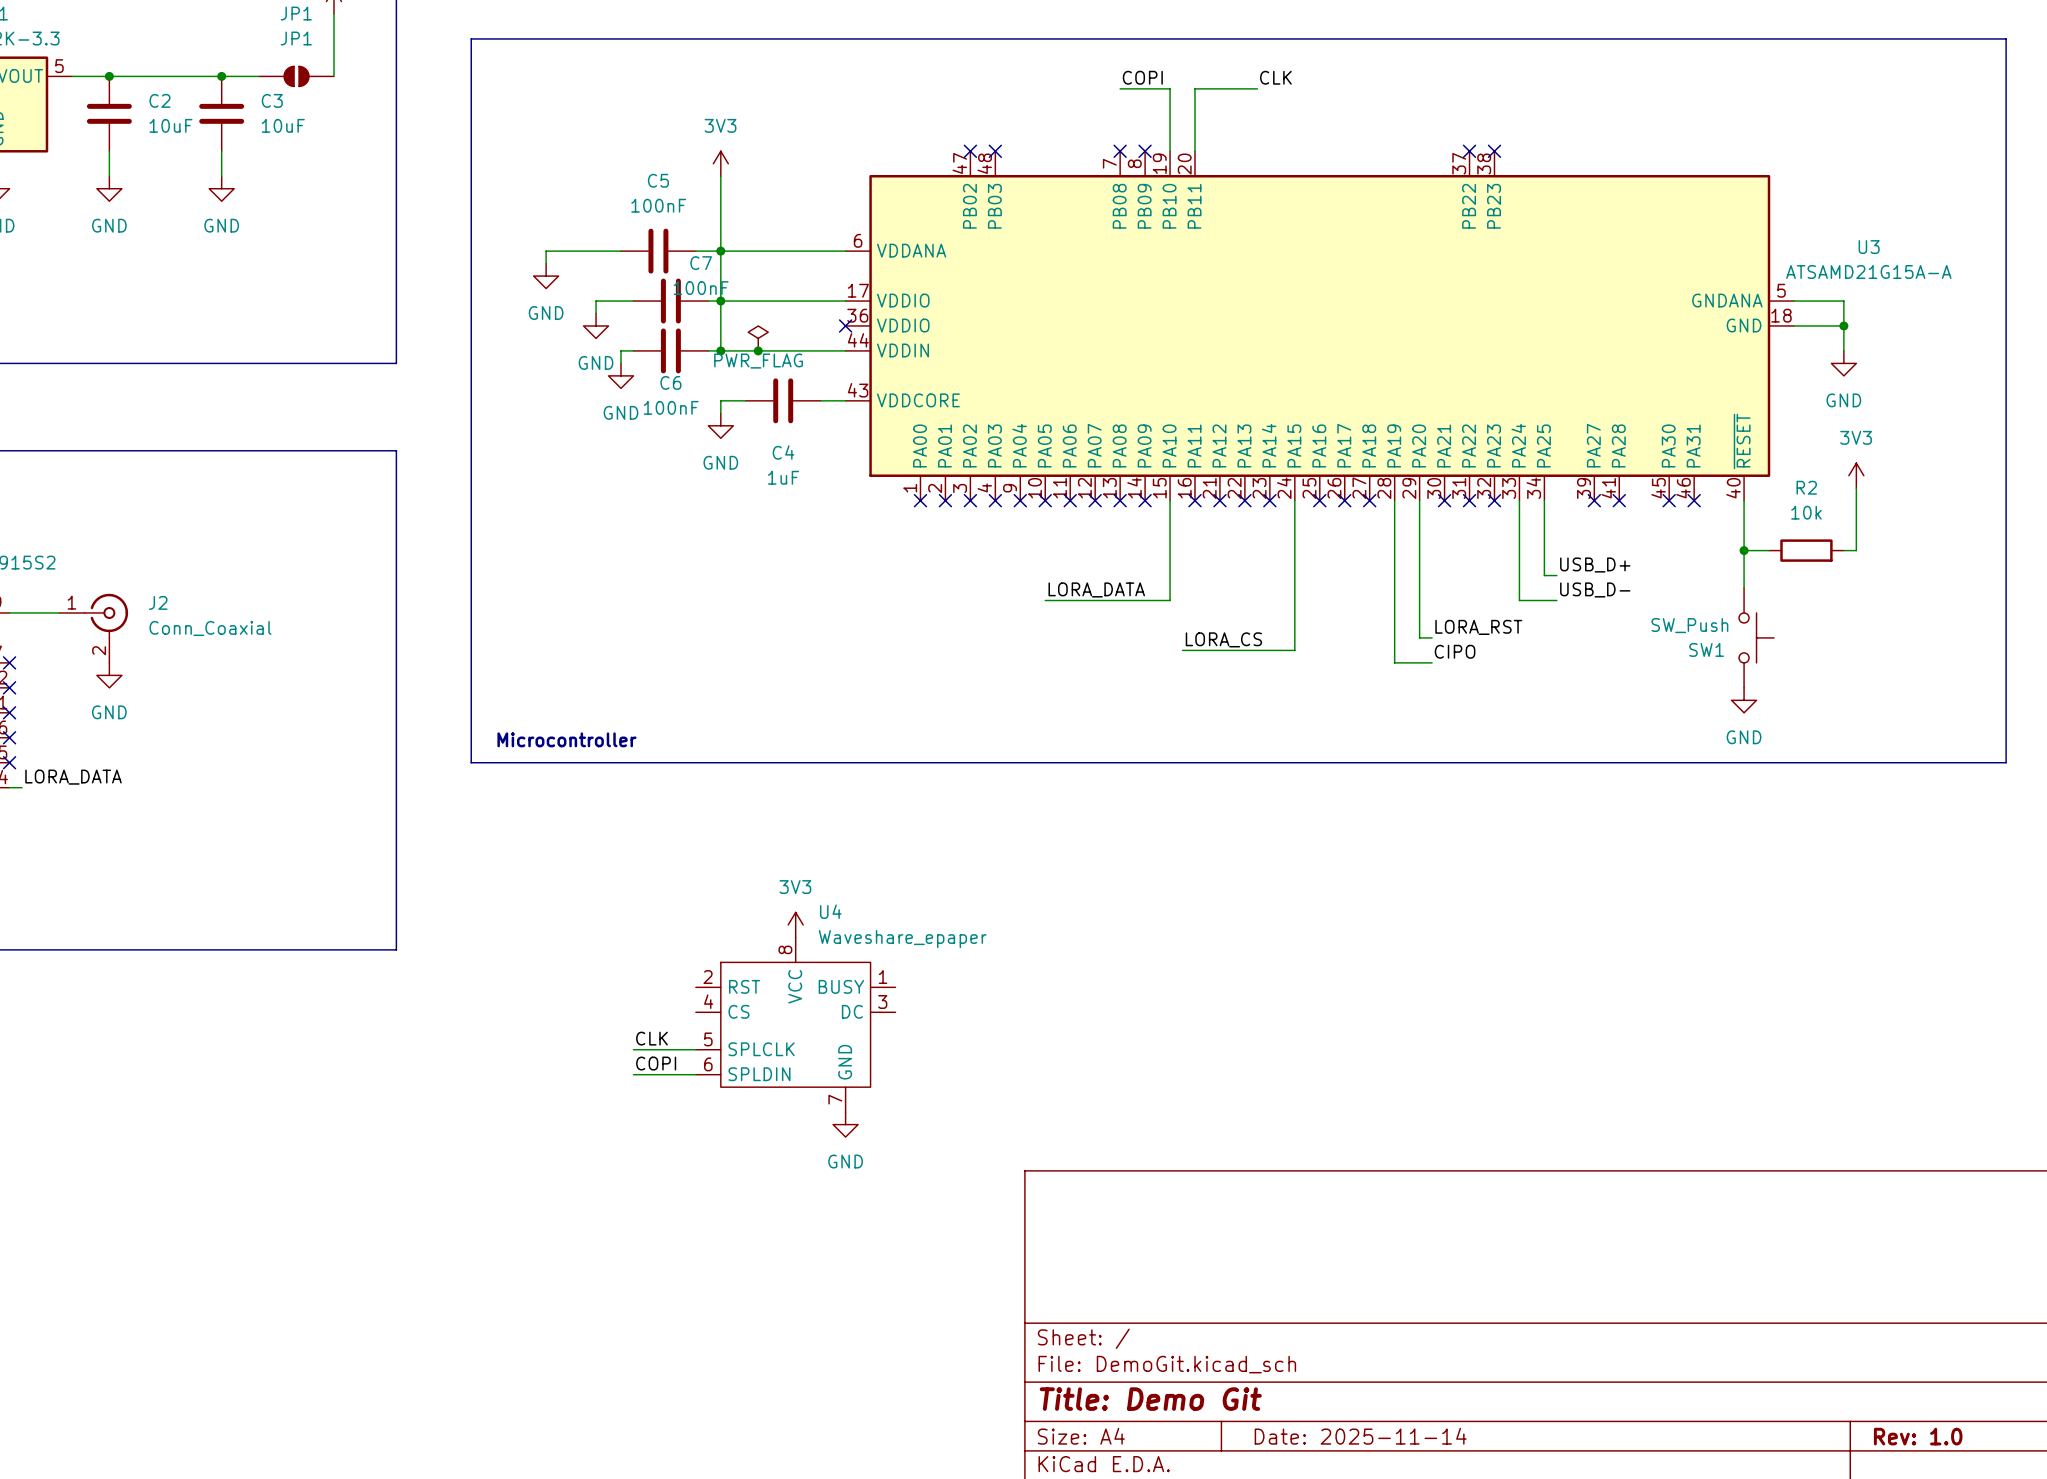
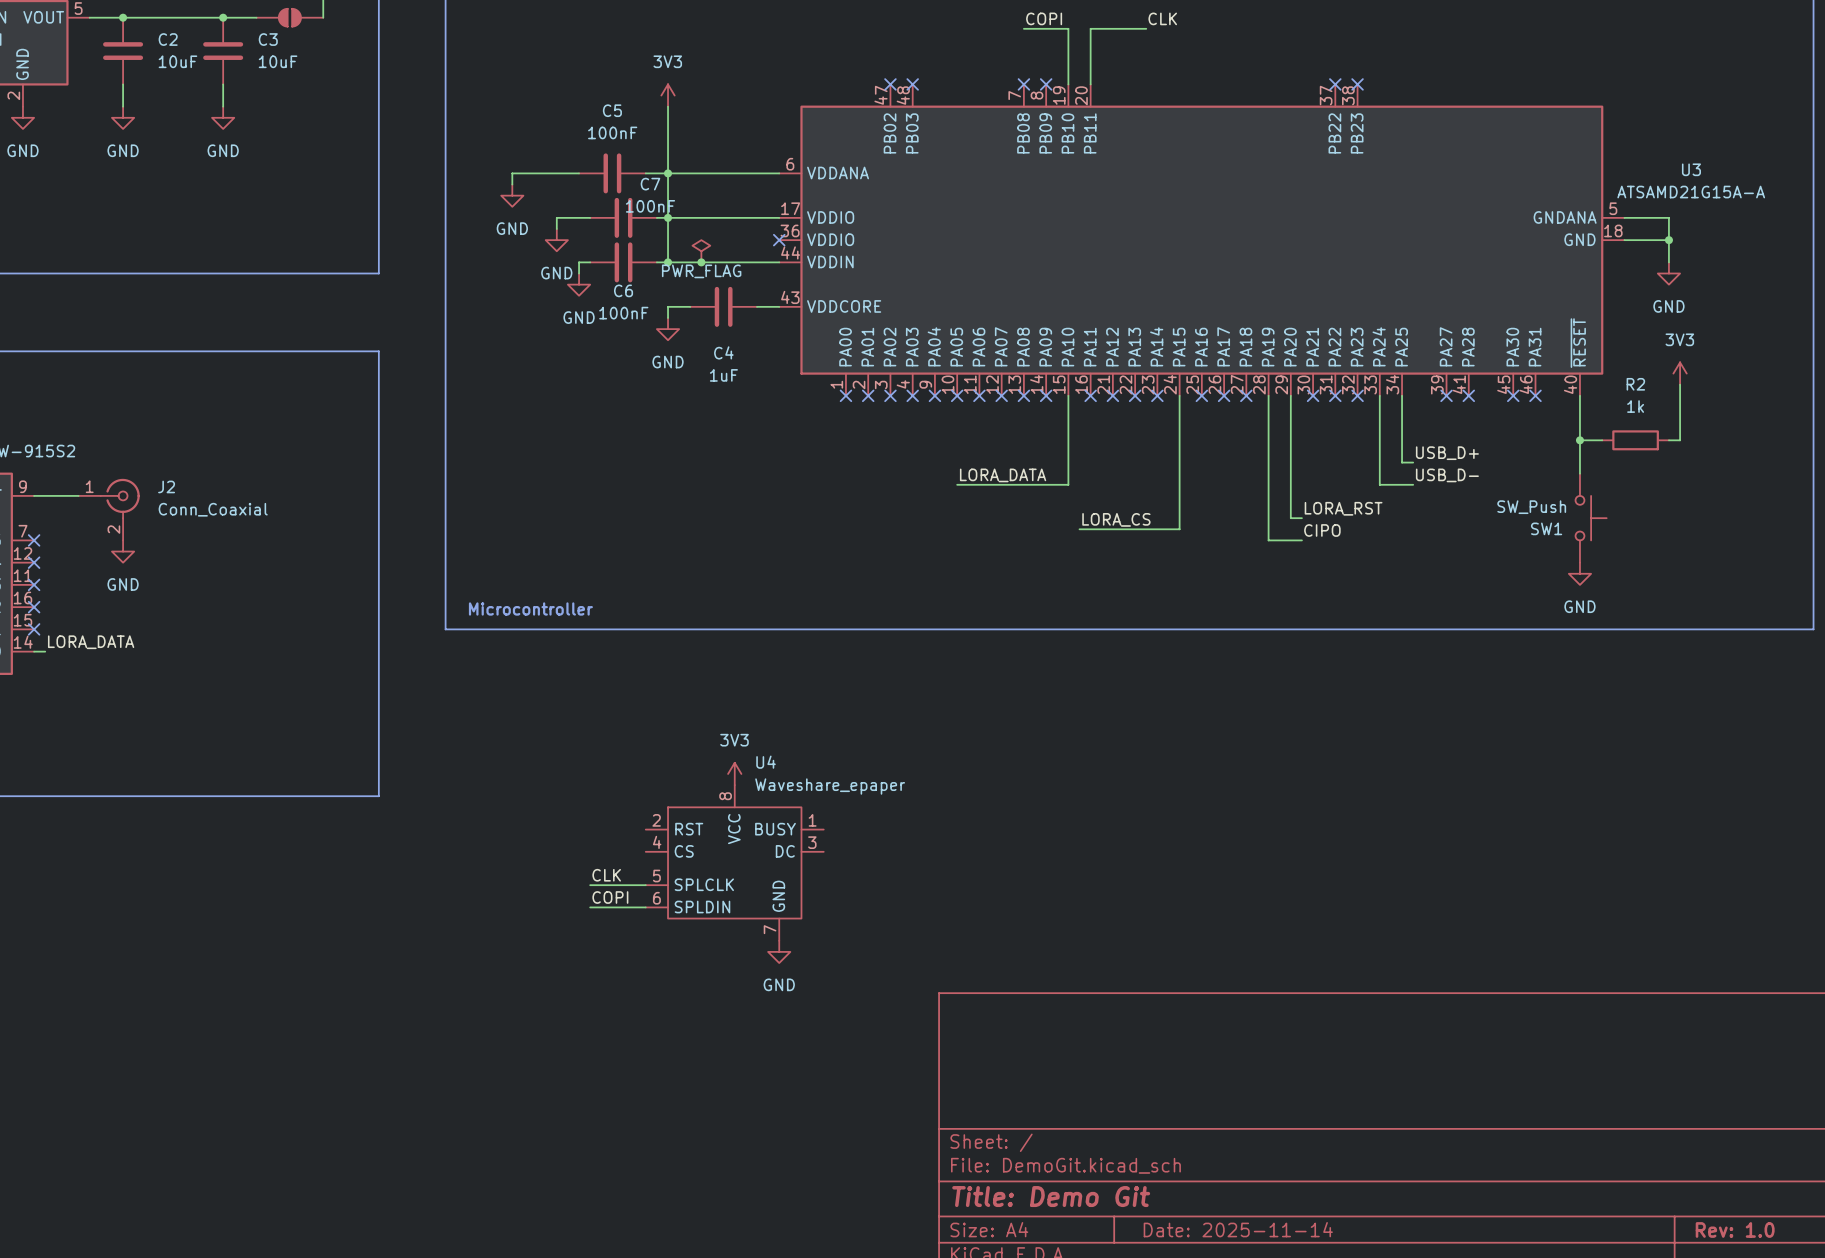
R2 value: 10k (1806, 512) -> 1k (1635, 406)

